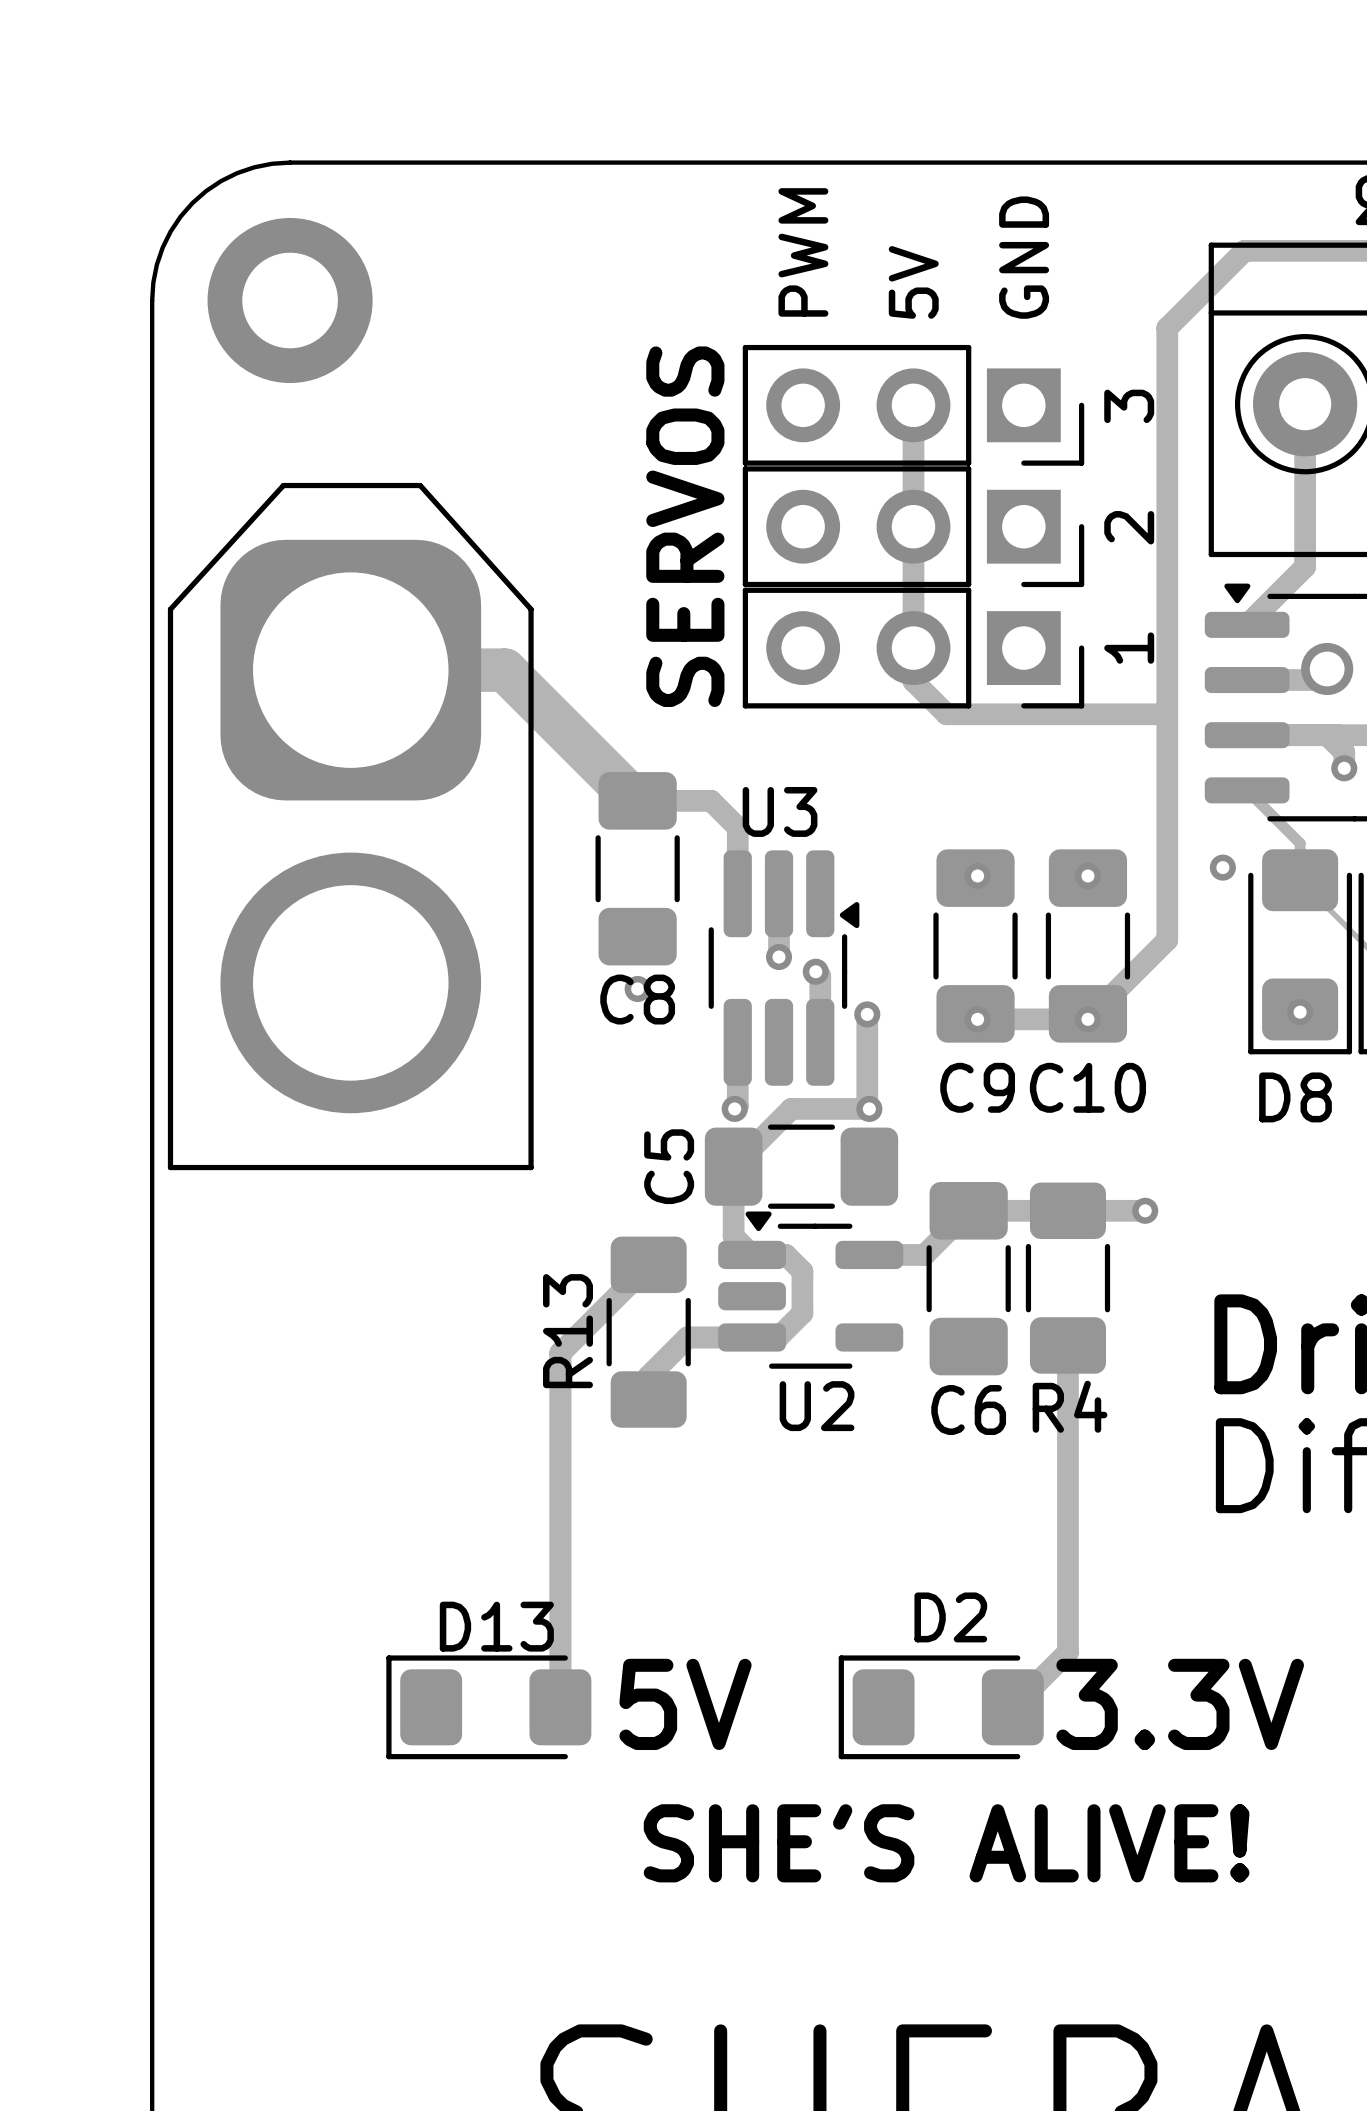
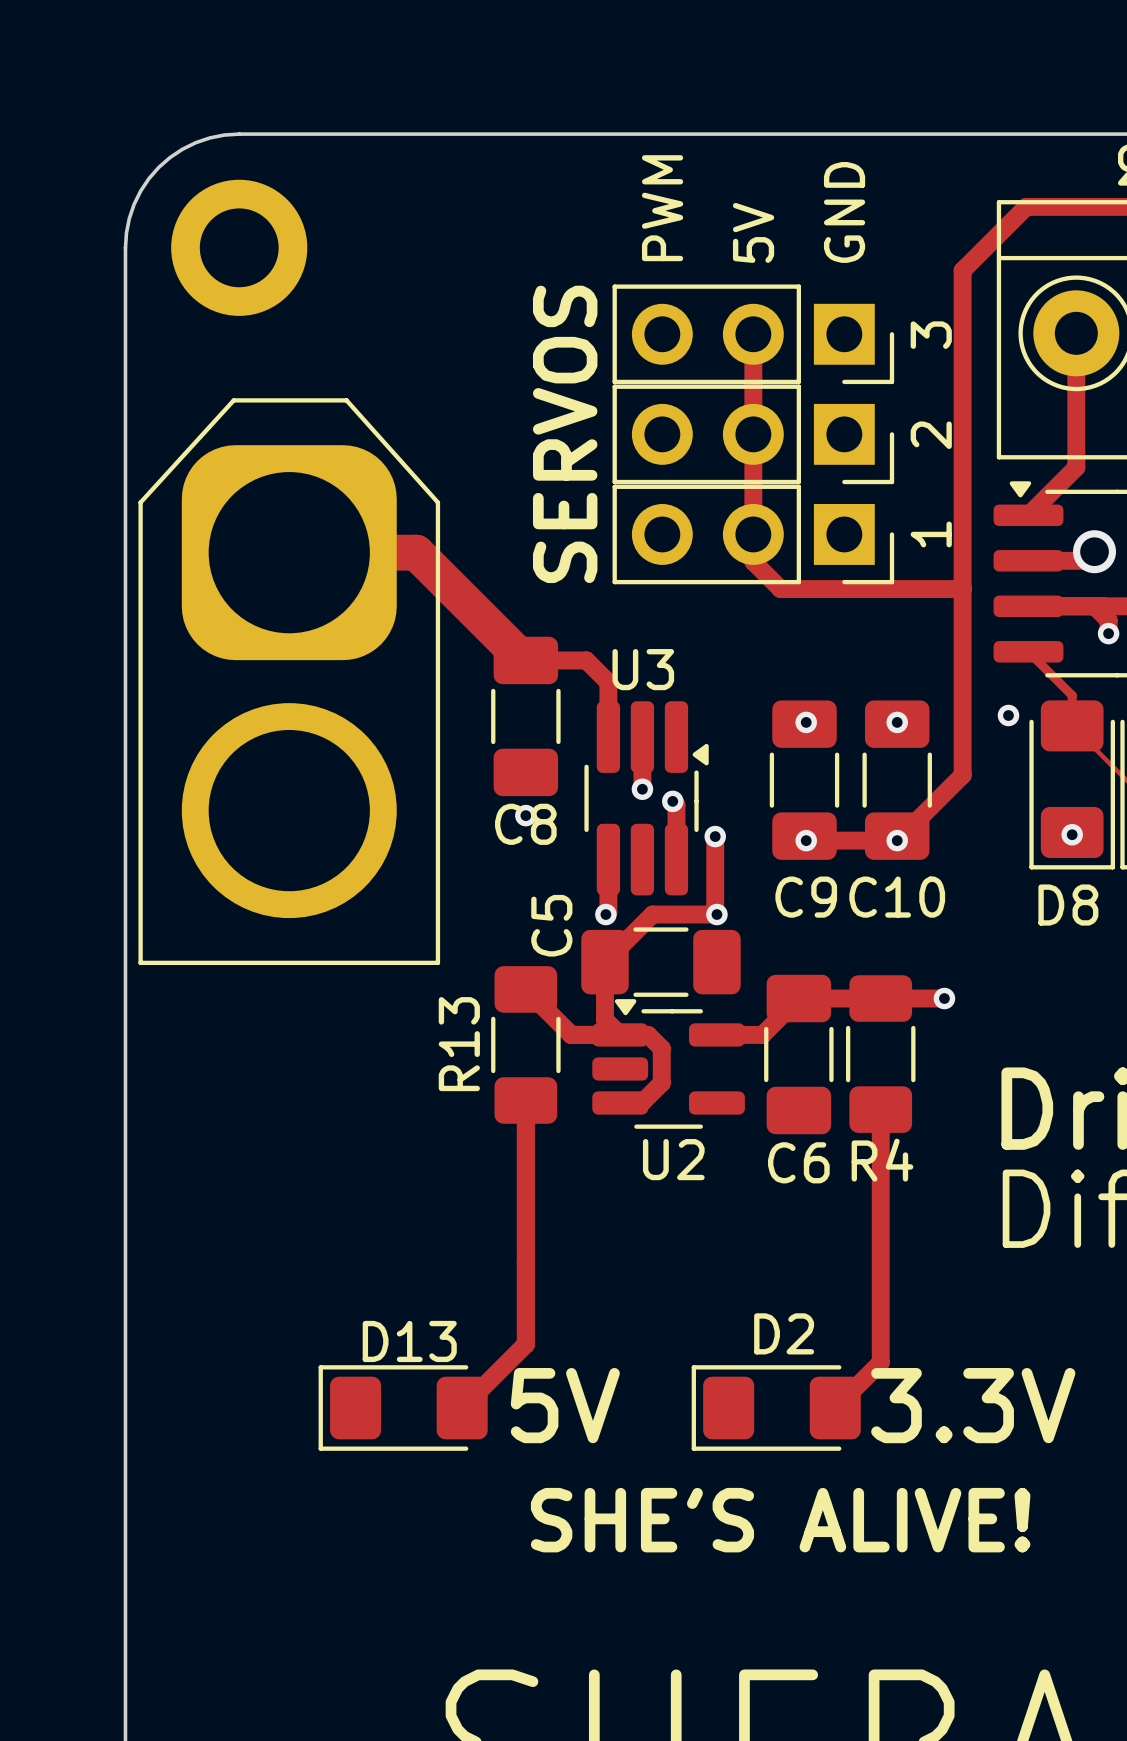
C5 name position: C5 (669, 1166) -> C5 (551, 925)
track: none -> (525, 989) (571, 1034) (620, 1034)
track: (648, 1264) (560, 1353) (560, 1707) -> (525, 1100) (525, 1344) (462, 1408)
R13 position: (648, 1332) -> (525, 1044)
track: (752, 1337) (687, 1337) (648, 1376) (648, 1399) -> none

